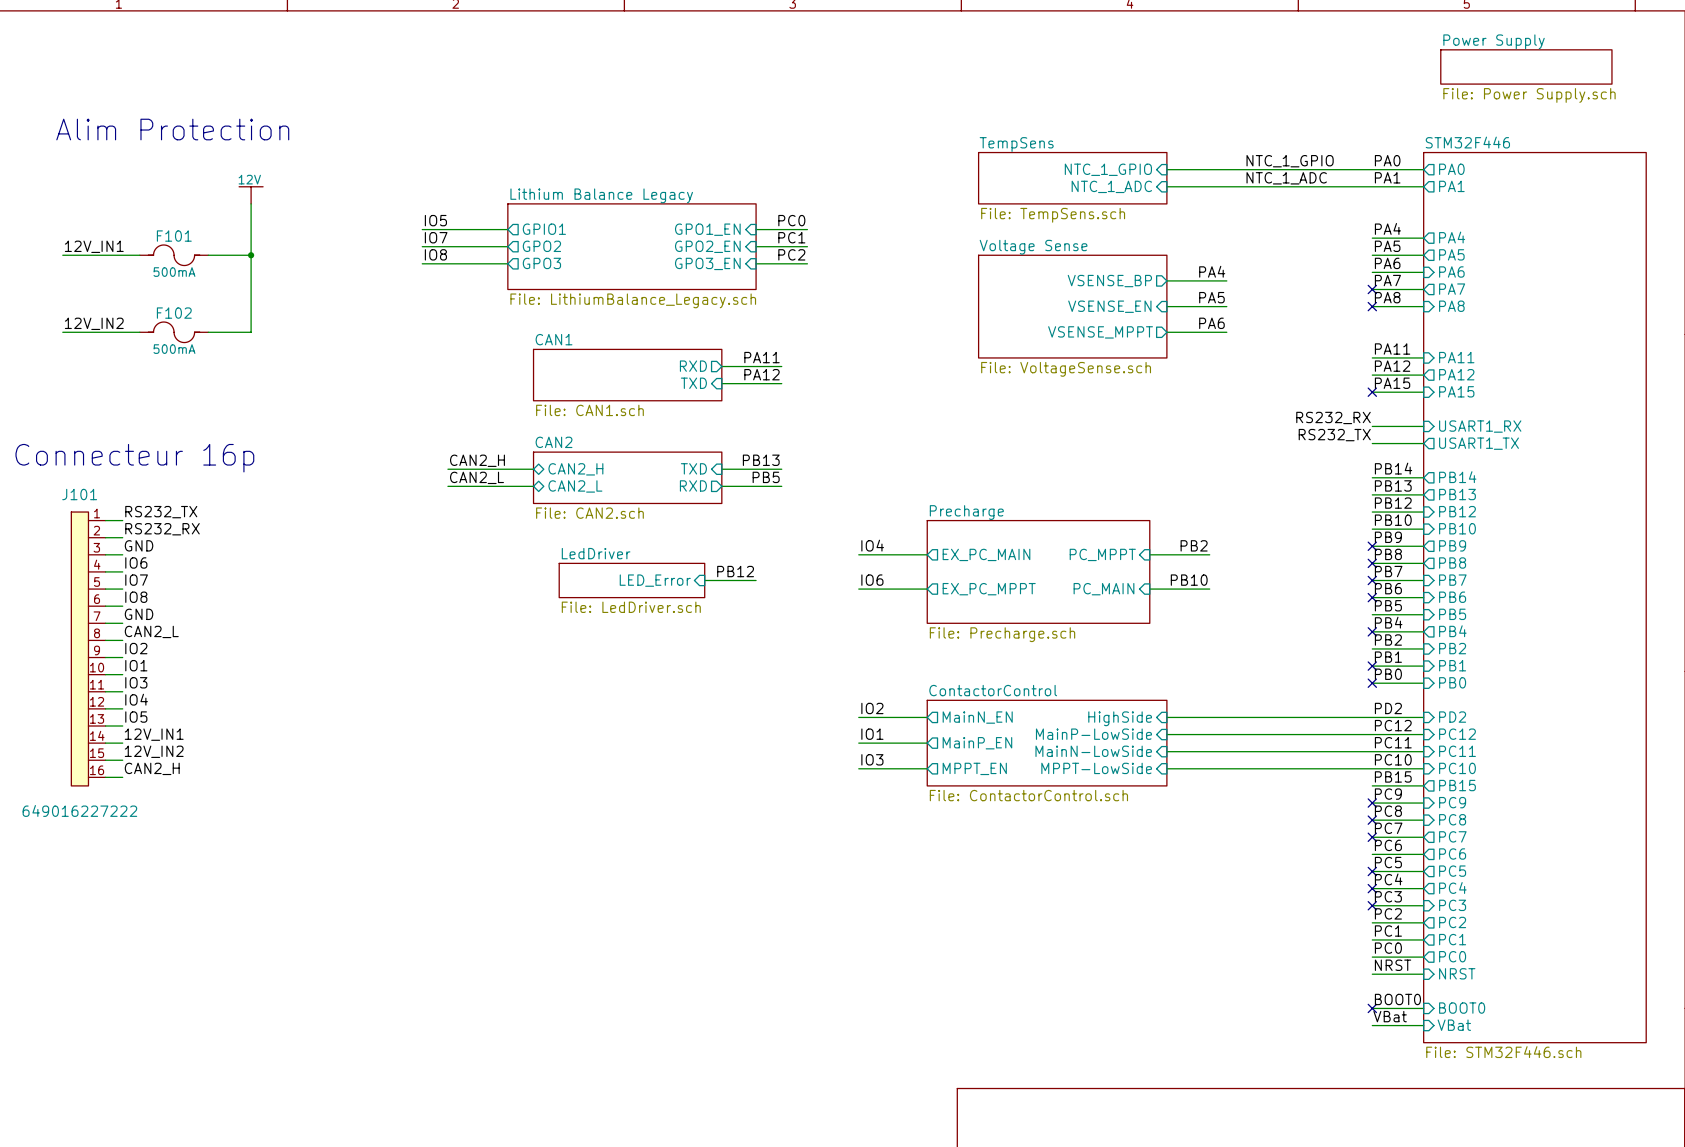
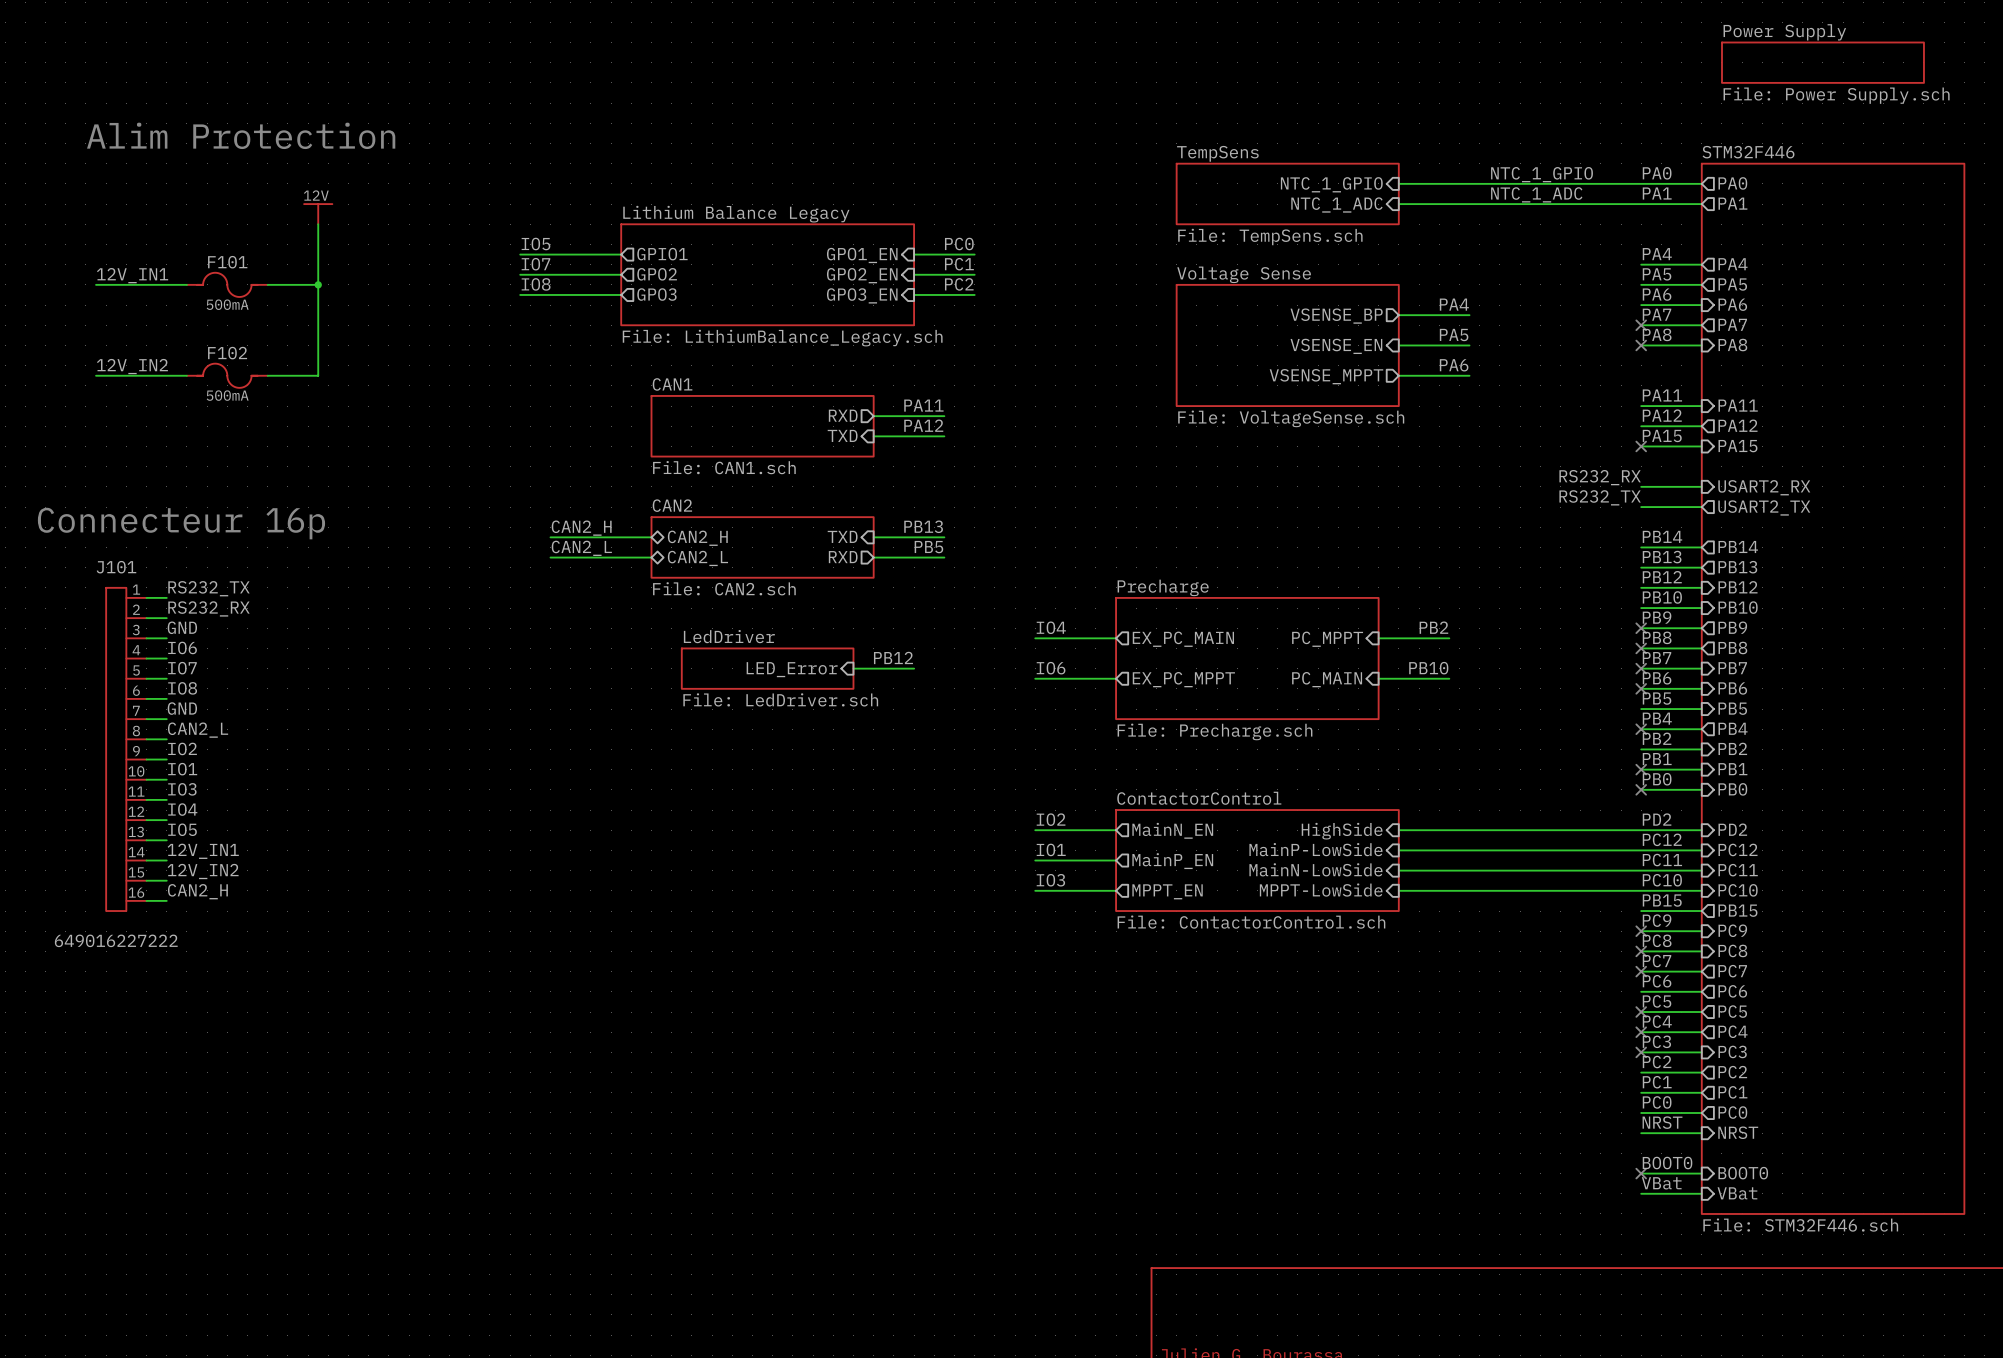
sheet pin: USART1_RX (1480, 426) -> USART2_RX (1764, 487)
sheet pin: USART1_TX (1479, 443) -> USART2_TX (1764, 507)

